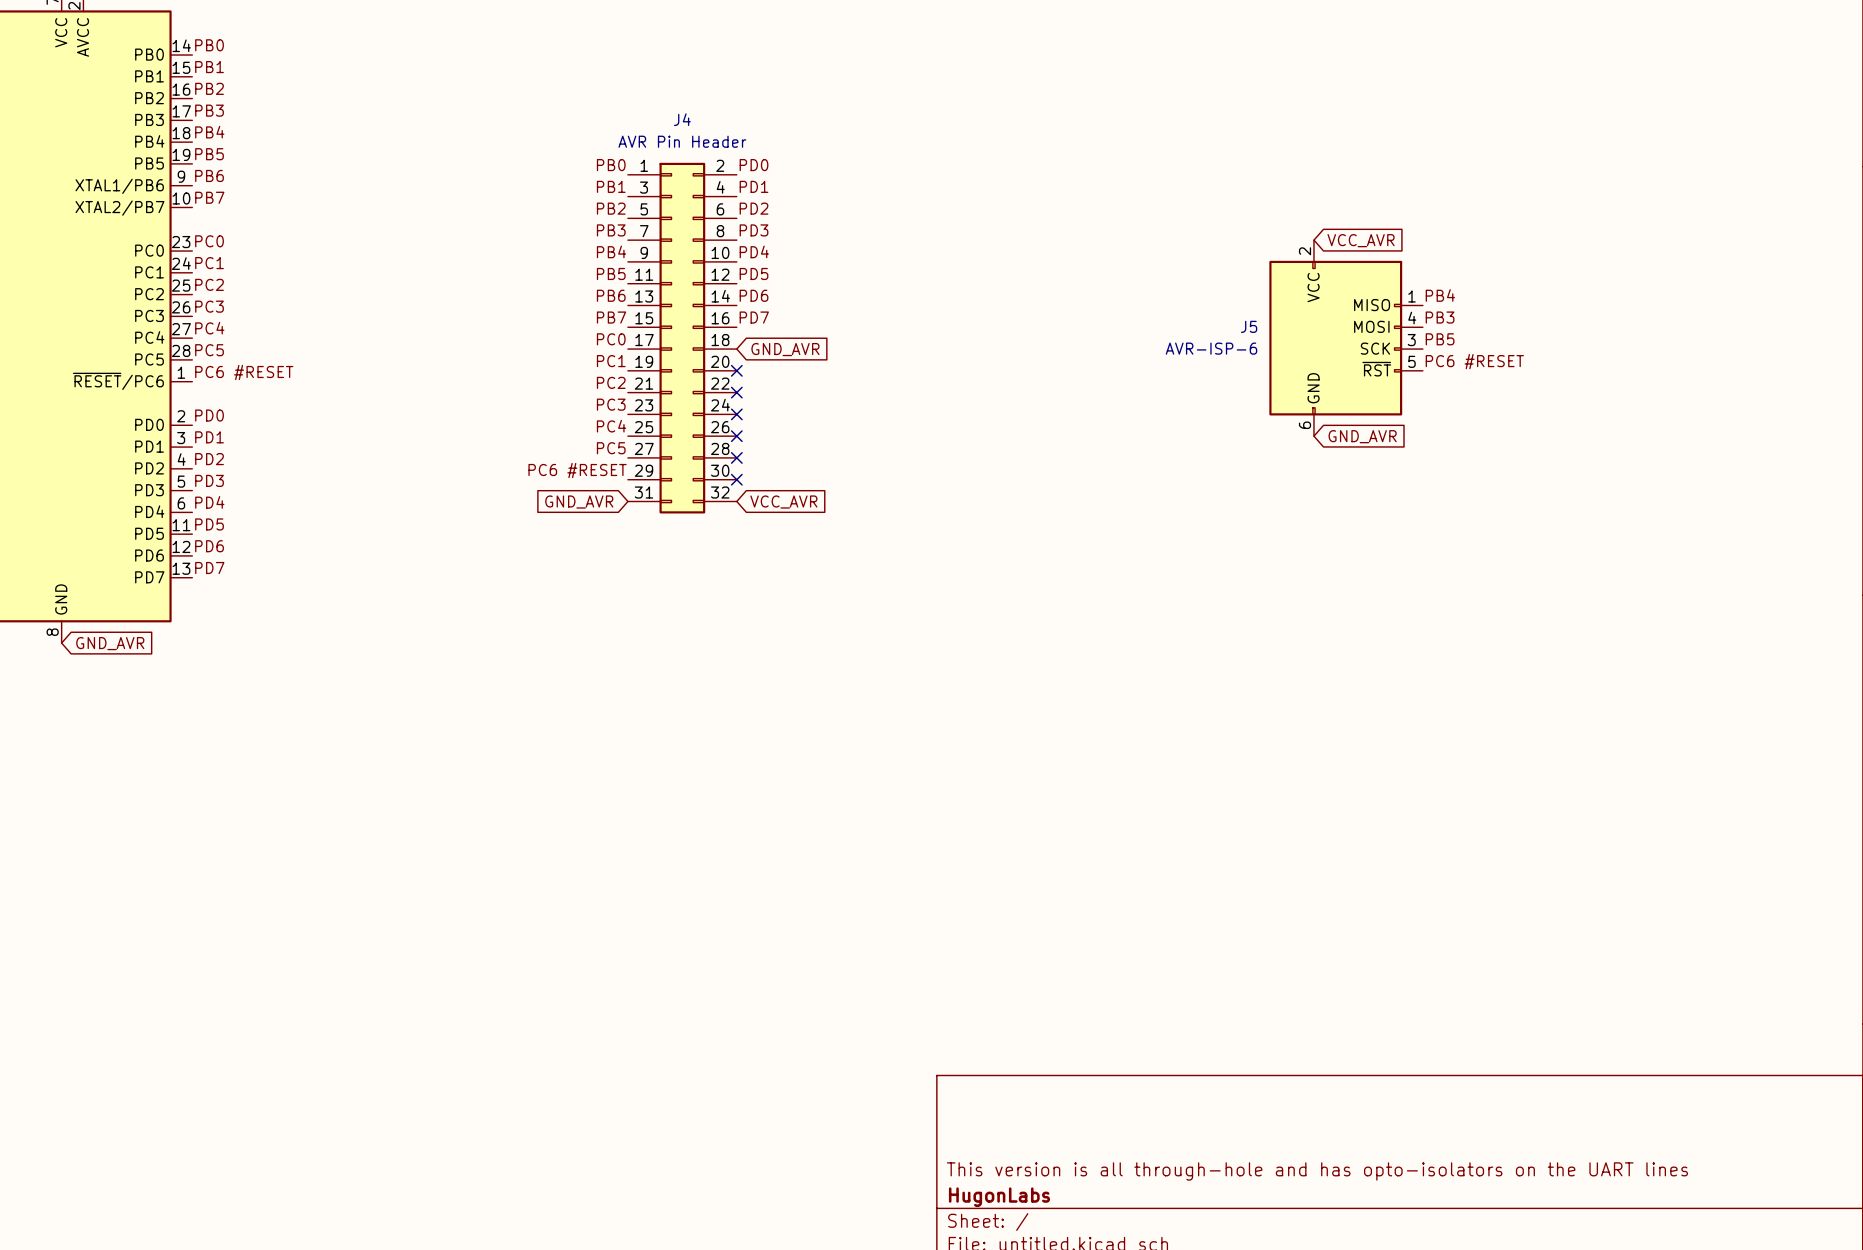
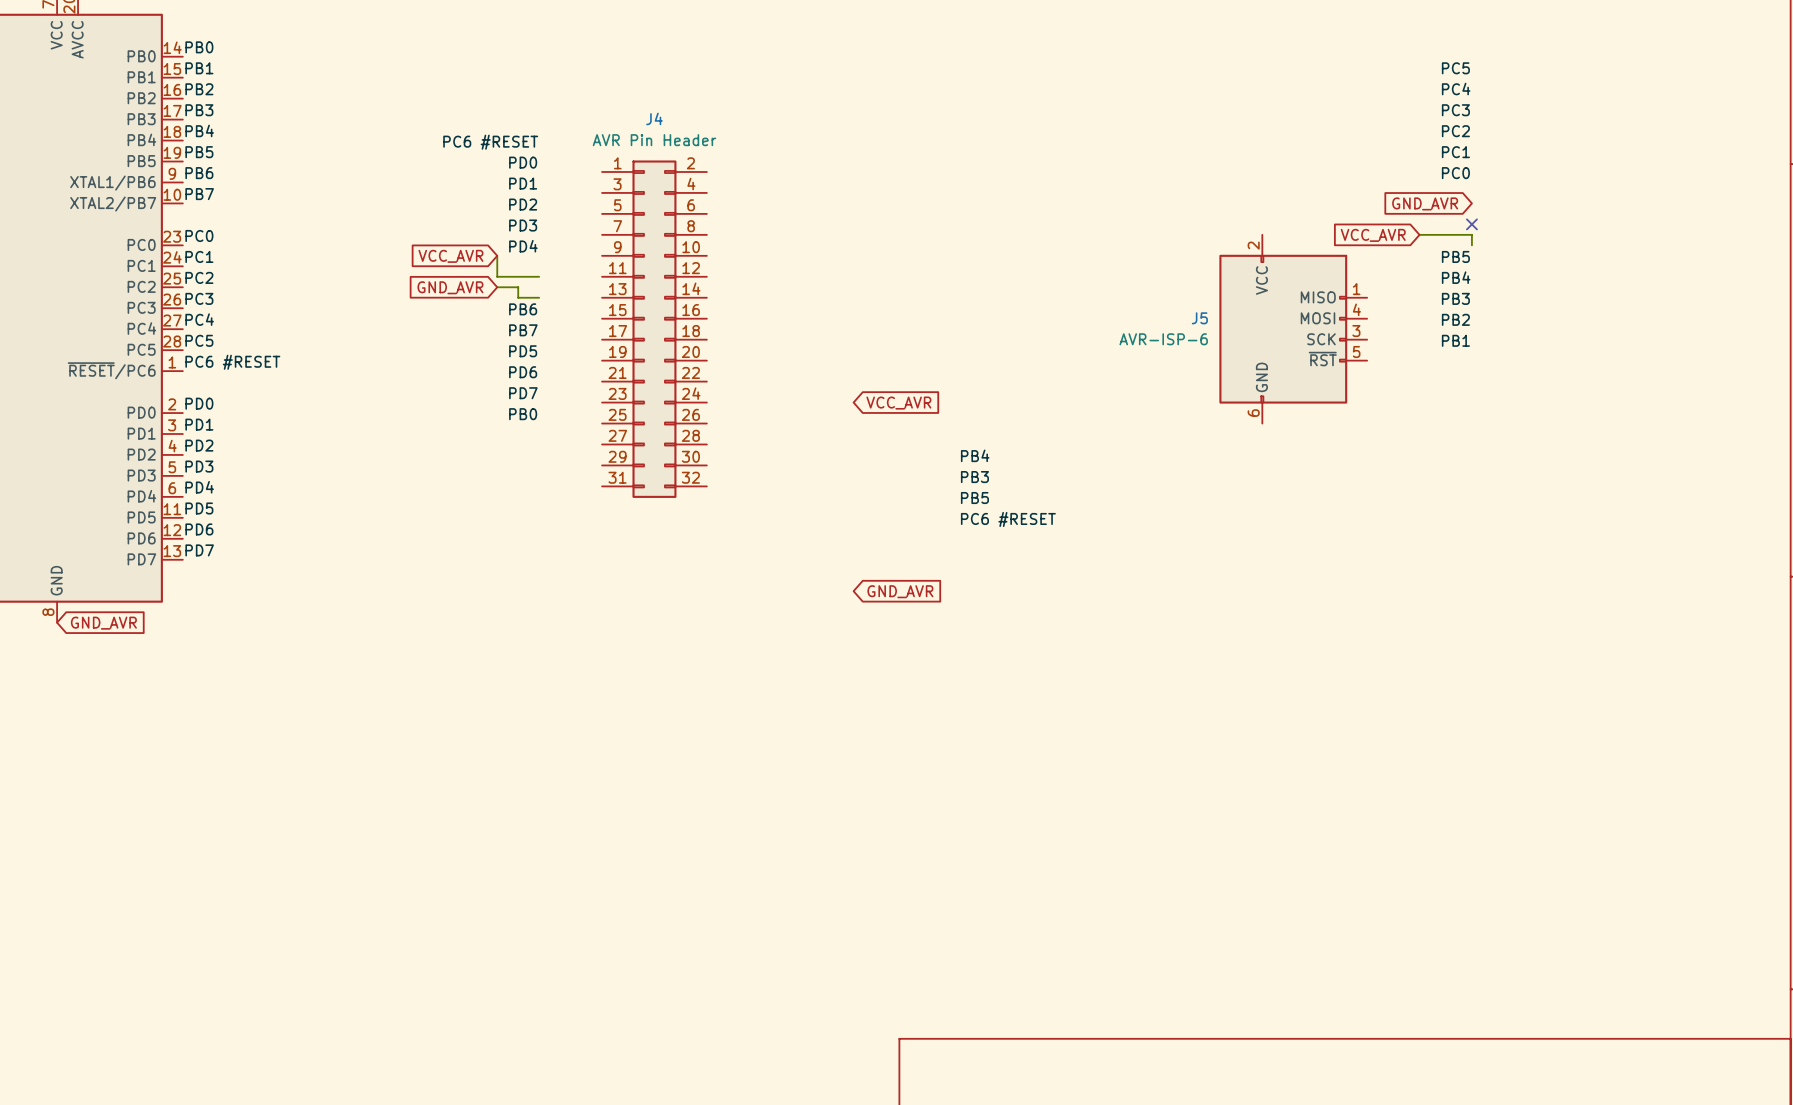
label: none -> PC5 (1455, 68)
label: none -> PC4 (1456, 89)
label: none -> PC3 (1455, 110)
label: none -> PC2 (1455, 131)
label: none -> PC6 #RESET (490, 142)
label: none -> PC1 (1455, 152)
label: PB0 (611, 165) -> none
label position: PD0 (754, 165) -> PD0 (523, 162)
label: none -> PC0 (1455, 173)
label: PB1 (611, 186) -> none
label position: PD1 (754, 186) -> PD1 (523, 183)
global label: none -> GND_AVR (1425, 203)
label: PB2 (611, 208) -> none
label position: PD2 (754, 208) -> PD2 (523, 204)
no-connect mark: none -> (1471, 224)
label: PB3 (611, 230) -> none
label position: PD3 (754, 230) -> PD3 (523, 225)
global label rotation: 0° (1361, 240) -> 180° (1373, 235)
wire: none -> (1419, 234) (1471, 234) (1471, 245)
label: PB4 (611, 251) -> none
label position: PD4 (754, 251) -> PD4 (523, 246)
wire: none -> (497, 255) (497, 276) (539, 276)
global label: none -> VCC_AVR (450, 256)
label: PB5 (611, 273) -> none
label position: PD5 (754, 273) -> PD5 (523, 351)
wire: none -> (497, 287) (518, 287) (518, 297) (539, 297)
global label: none -> GND_AVR (450, 287)
label position: PB6 (611, 295) -> PB6 (523, 309)
label position: PD6 (754, 295) -> PD6 (523, 372)
label position: PB4 (1440, 295) -> PB4 (1456, 277)
label position: PB7 (611, 317) -> PB7 (523, 330)
label position: PD7 (754, 317) -> PD7 (523, 393)
label position: PB3 (1440, 317) -> PB3 (1455, 298)
label: none -> PB2 (1455, 319)
label: PC0 (611, 339) -> none
label position: PB5 (1440, 339) -> PB5 (1455, 256)
global label: GND_AVR (785, 349) -> none
label: none -> PB1 (1455, 340)
label: PC1 (611, 361) -> none
label: PC6 #RESET (1474, 361) -> none
no-connect mark: (736, 370) -> none
label: PC2 (611, 382) -> none
no-connect mark: (736, 392) -> none
label: PC3 (611, 404) -> none
no-connect mark: (736, 414) -> none
global label: none -> VCC_AVR (898, 403)
label: none -> PB0 (523, 414)
label: PC4 (611, 426) -> none
no-connect mark: (736, 436) -> none
global label: GND_AVR (1362, 436) -> none
label: PC5 (611, 448) -> none
no-connect mark: (736, 457) -> none
label: none -> PB4 (975, 455)
label: PC6 #RESET (577, 470) -> none
no-connect mark: (736, 479) -> none
label: none -> PB3 (974, 477)
global label: GND_AVR (579, 502) -> none
global label: VCC_AVR (783, 502) -> none
label: none -> PB5 (974, 498)
label: none -> PC6 #RESET (1008, 519)
global label: none -> GND_AVR (900, 591)

